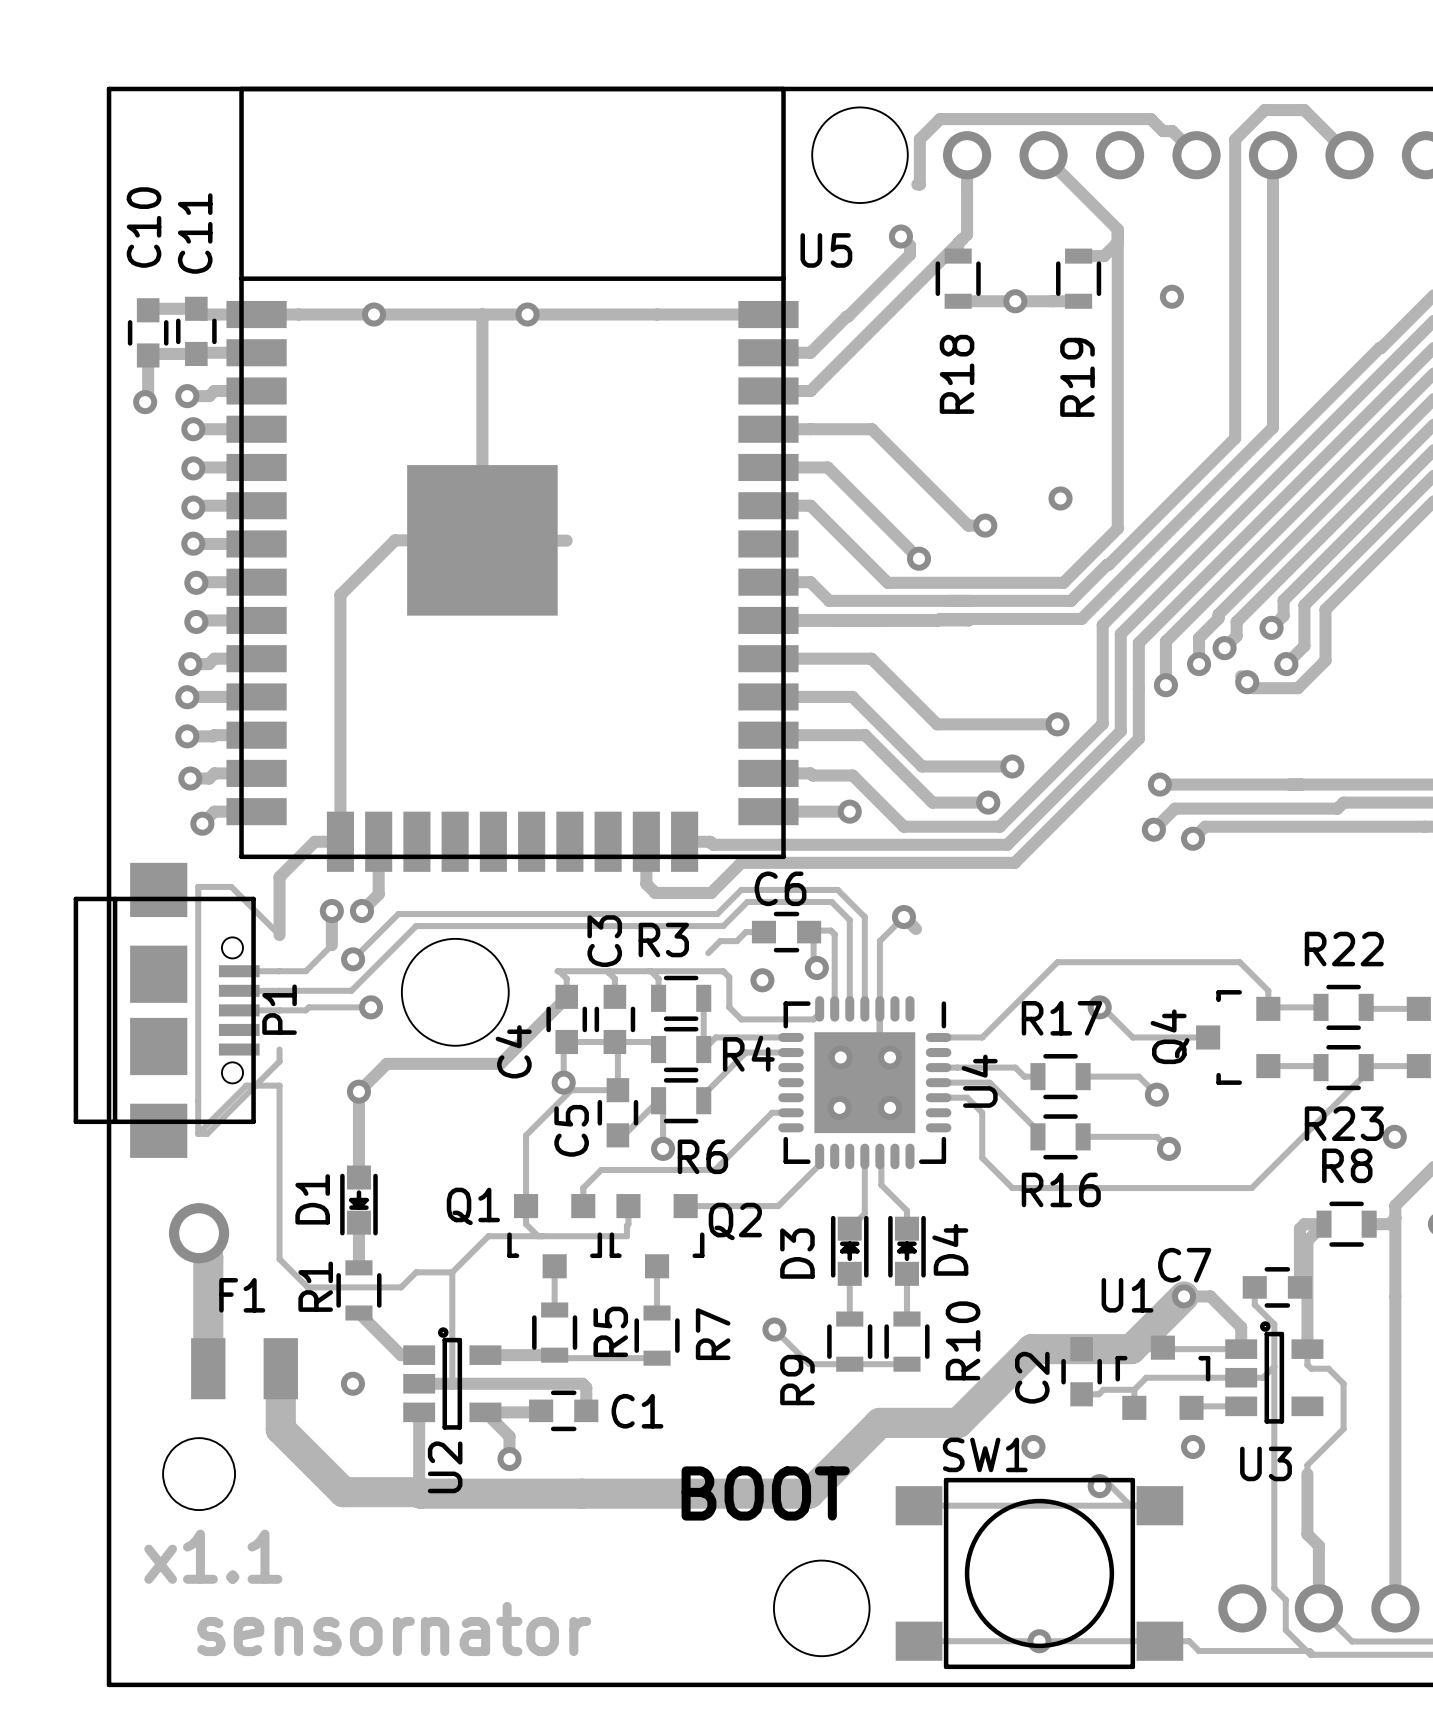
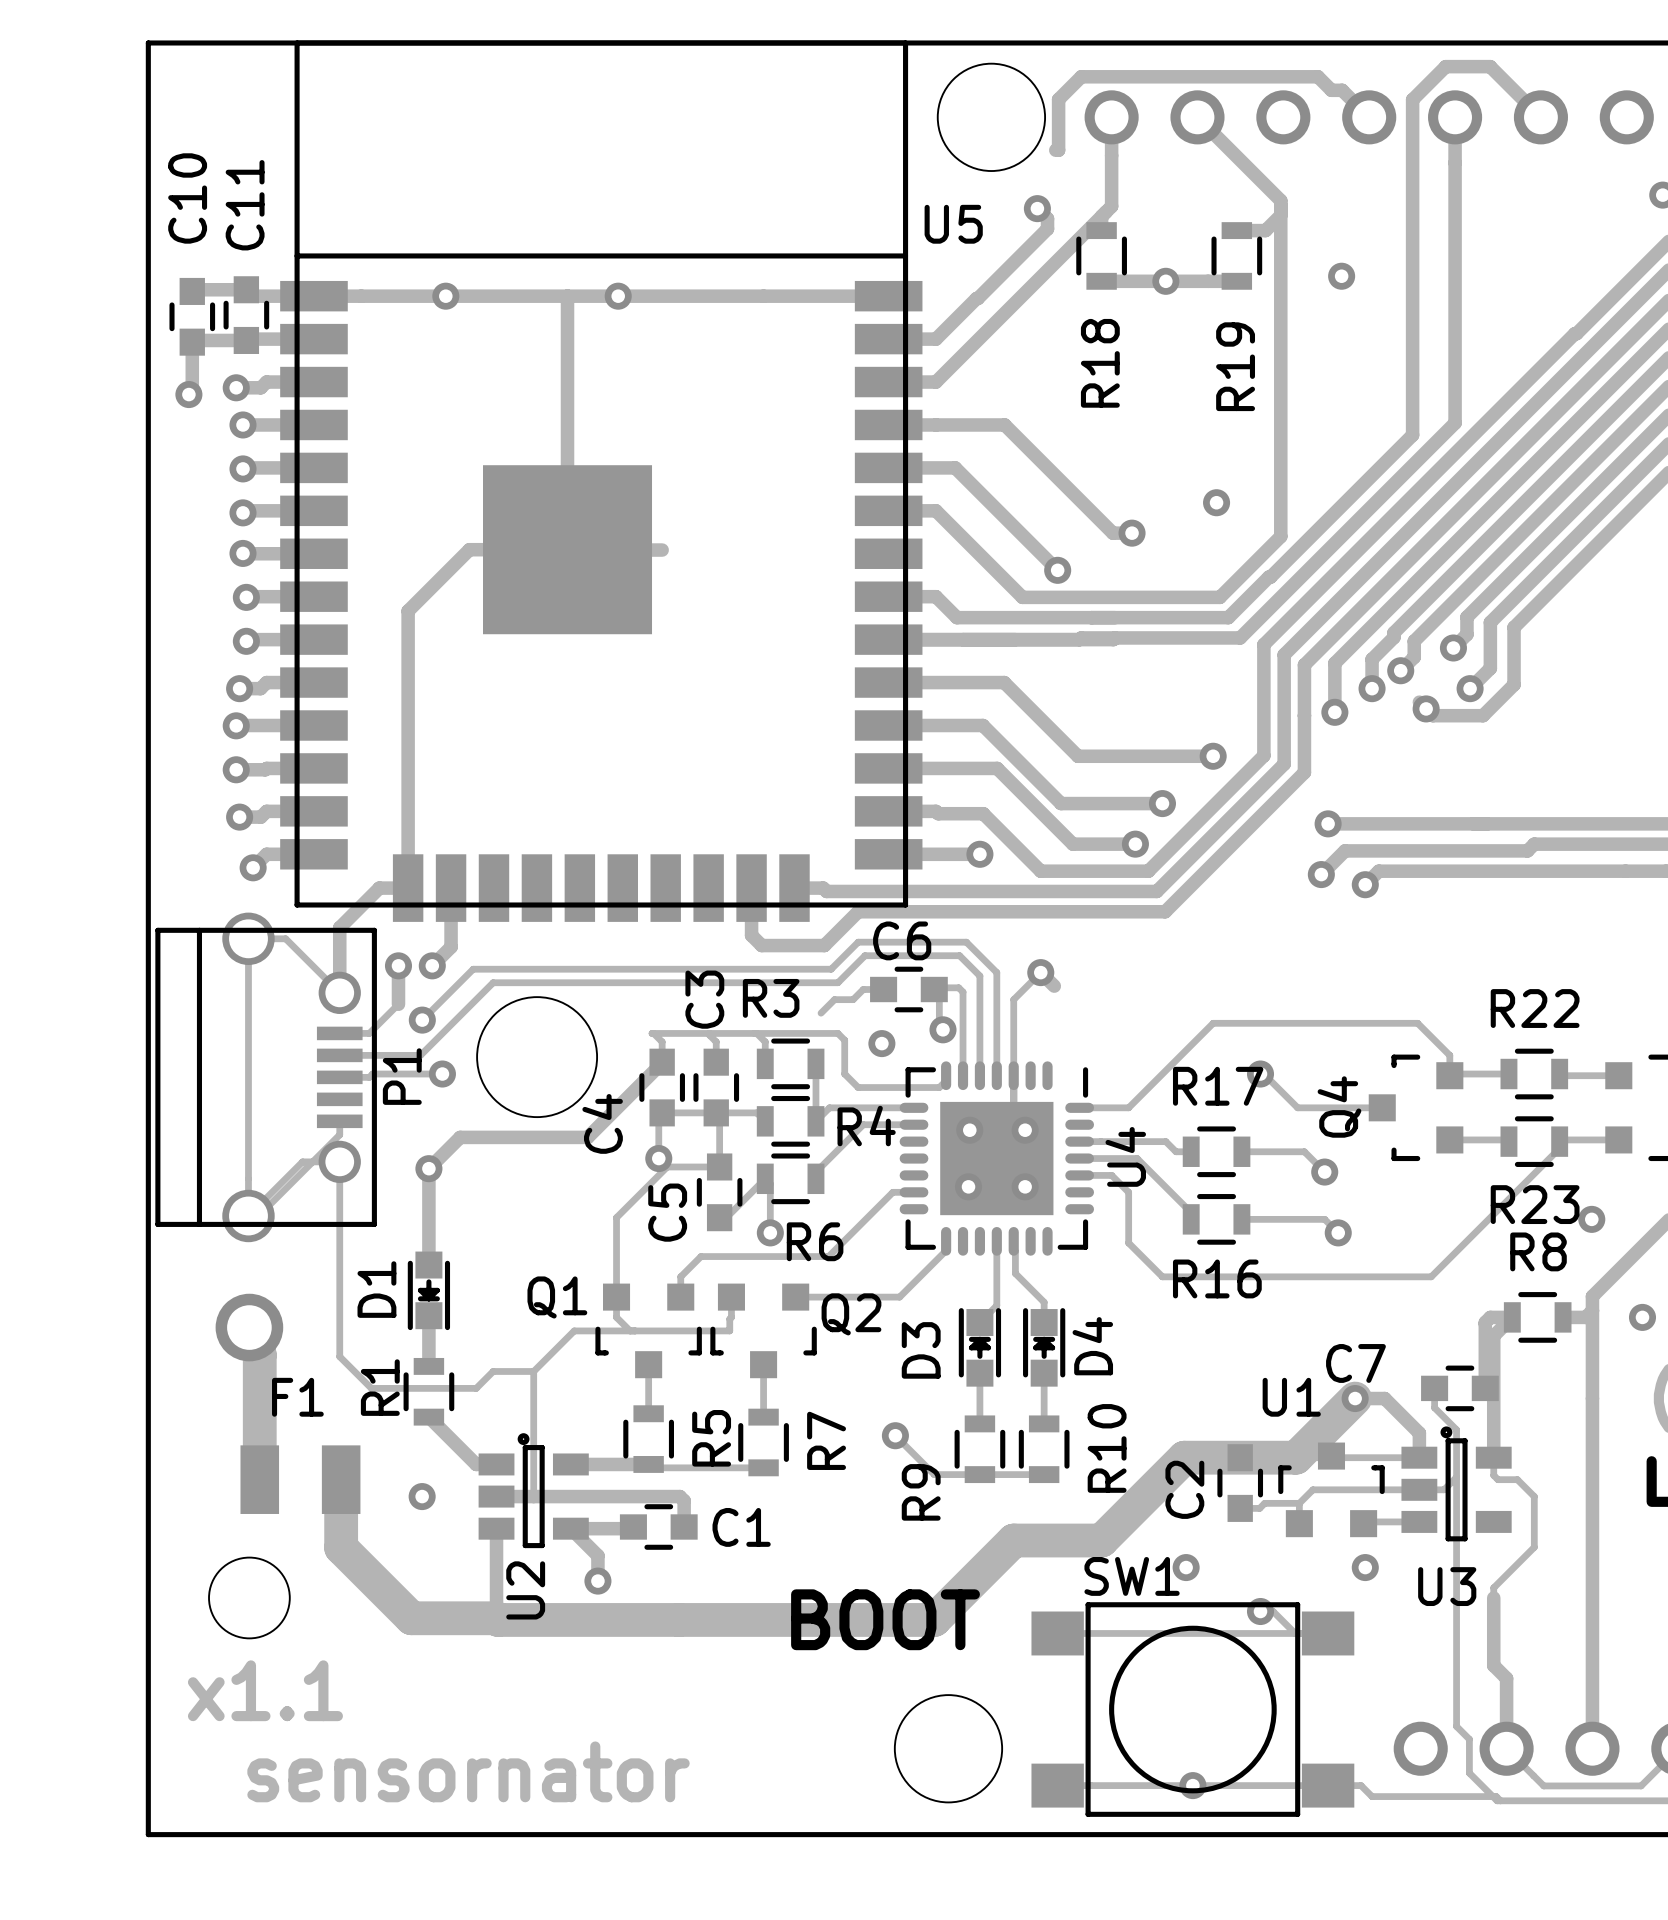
P1 footprint: [73, 862, 260, 1158] -> [155, 912, 377, 1243]

